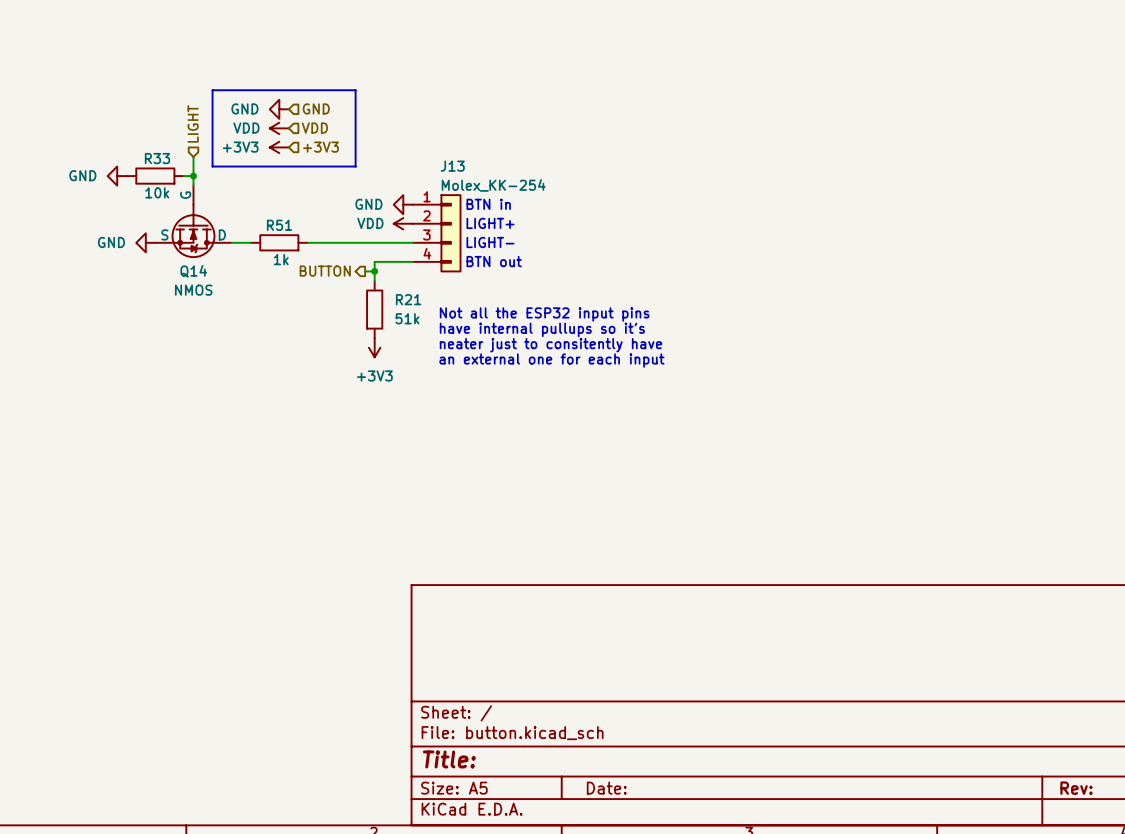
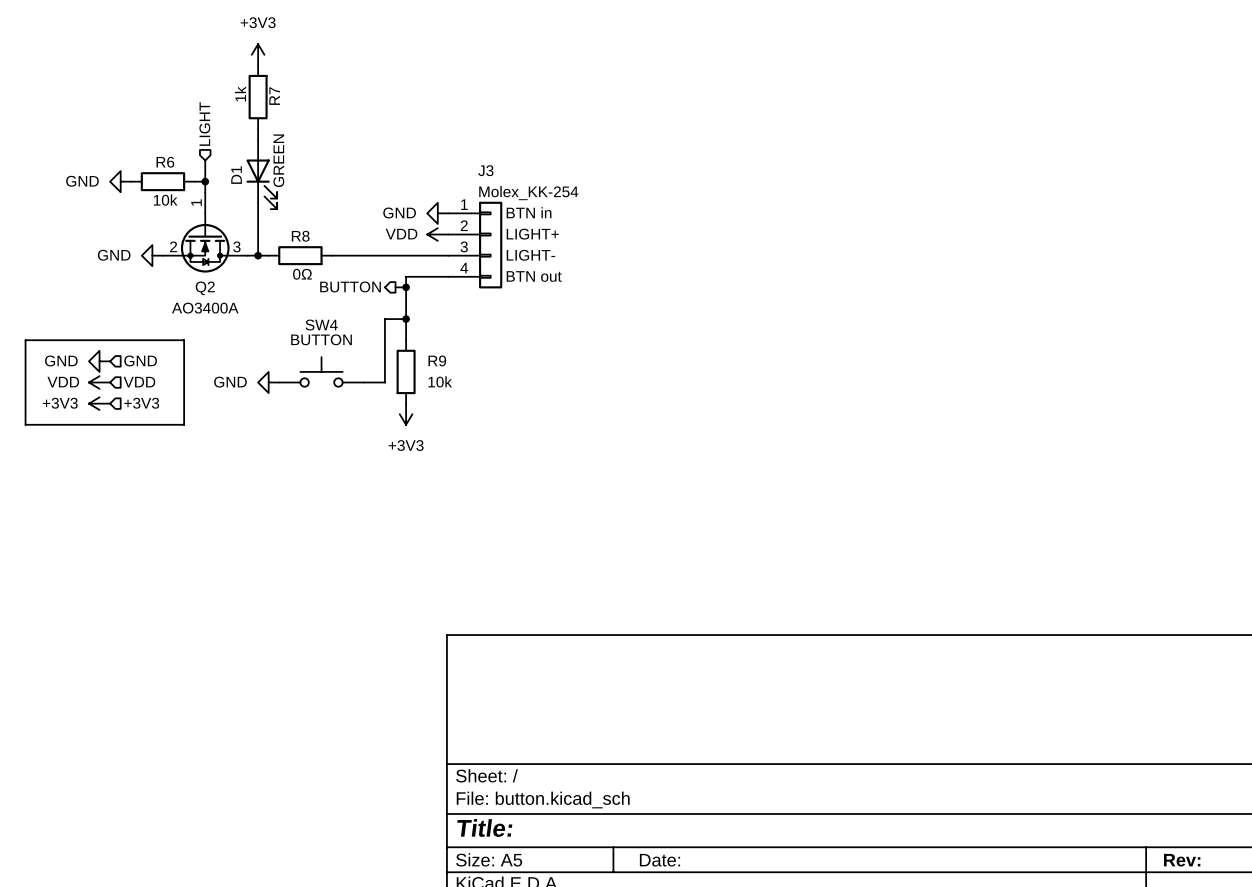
line: (212, 90) (355, 90) (355, 166) (212, 166) (212, 90) -> none
R7: none -> 1k (258, 97)
hierarchical label: GND (316, 108) -> none
power symbol: GND (279, 109) -> none
wire: none -> (258, 128) (258, 139)
power symbol: VDD (279, 128) -> none
hierarchical label: VDD (314, 128) -> none
power symbol rotation: 0° (279, 147) -> 90° clockwise (258, 54)
power symbol position: +3V3 (279, 147) -> +3V3 (258, 54)
hierarchical label: +3V3 (321, 147) -> none
R33 name: R33 (157, 158) -> R6 (165, 162)
J13 name: J13 (452, 166) -> J3 (485, 170)
D1: none -> GREEN (261, 174)
wire: none -> (258, 202) (258, 255)
Q14: NMOS (193, 221) -> none
Q2: none -> AO3400A (205, 232)
R51 name: R51 (279, 225) -> R8 (300, 236)
junction: none -> (258, 255)
R51 value: 1k (281, 259) -> 0Ω (302, 274)
wire: none -> (406, 297) (406, 340)
wire: none -> (406, 319) (384, 319) (384, 382) (363, 382)
junction: none -> (406, 319)
R21: 51k (374, 309) -> none
text: Not all the ESP32 input pins (544, 314) -> none
line: none -> (25, 340) (184, 340) (184, 424) (25, 424) (25, 340)
text: have internal pullups so it's (542, 329) -> none
hierarchical label: none -> GND (140, 360)
power symbol: none -> GND (99, 361)
text: neater just to consitently have (550, 345) -> none
SW4: none -> BUTTON (321, 371)
power symbol position: +3V3 (374, 347) -> +3V3 (406, 414)
R9: none -> 10k (406, 371)
hierarchical label: none -> VDD (139, 382)
power symbol: none -> VDD (99, 382)
power symbol: none -> GND (268, 382)
text: an external one for each input (551, 360) -> none
hierarchical label: none -> +3V3 (141, 403)
power symbol: none -> +3V3 (99, 403)

